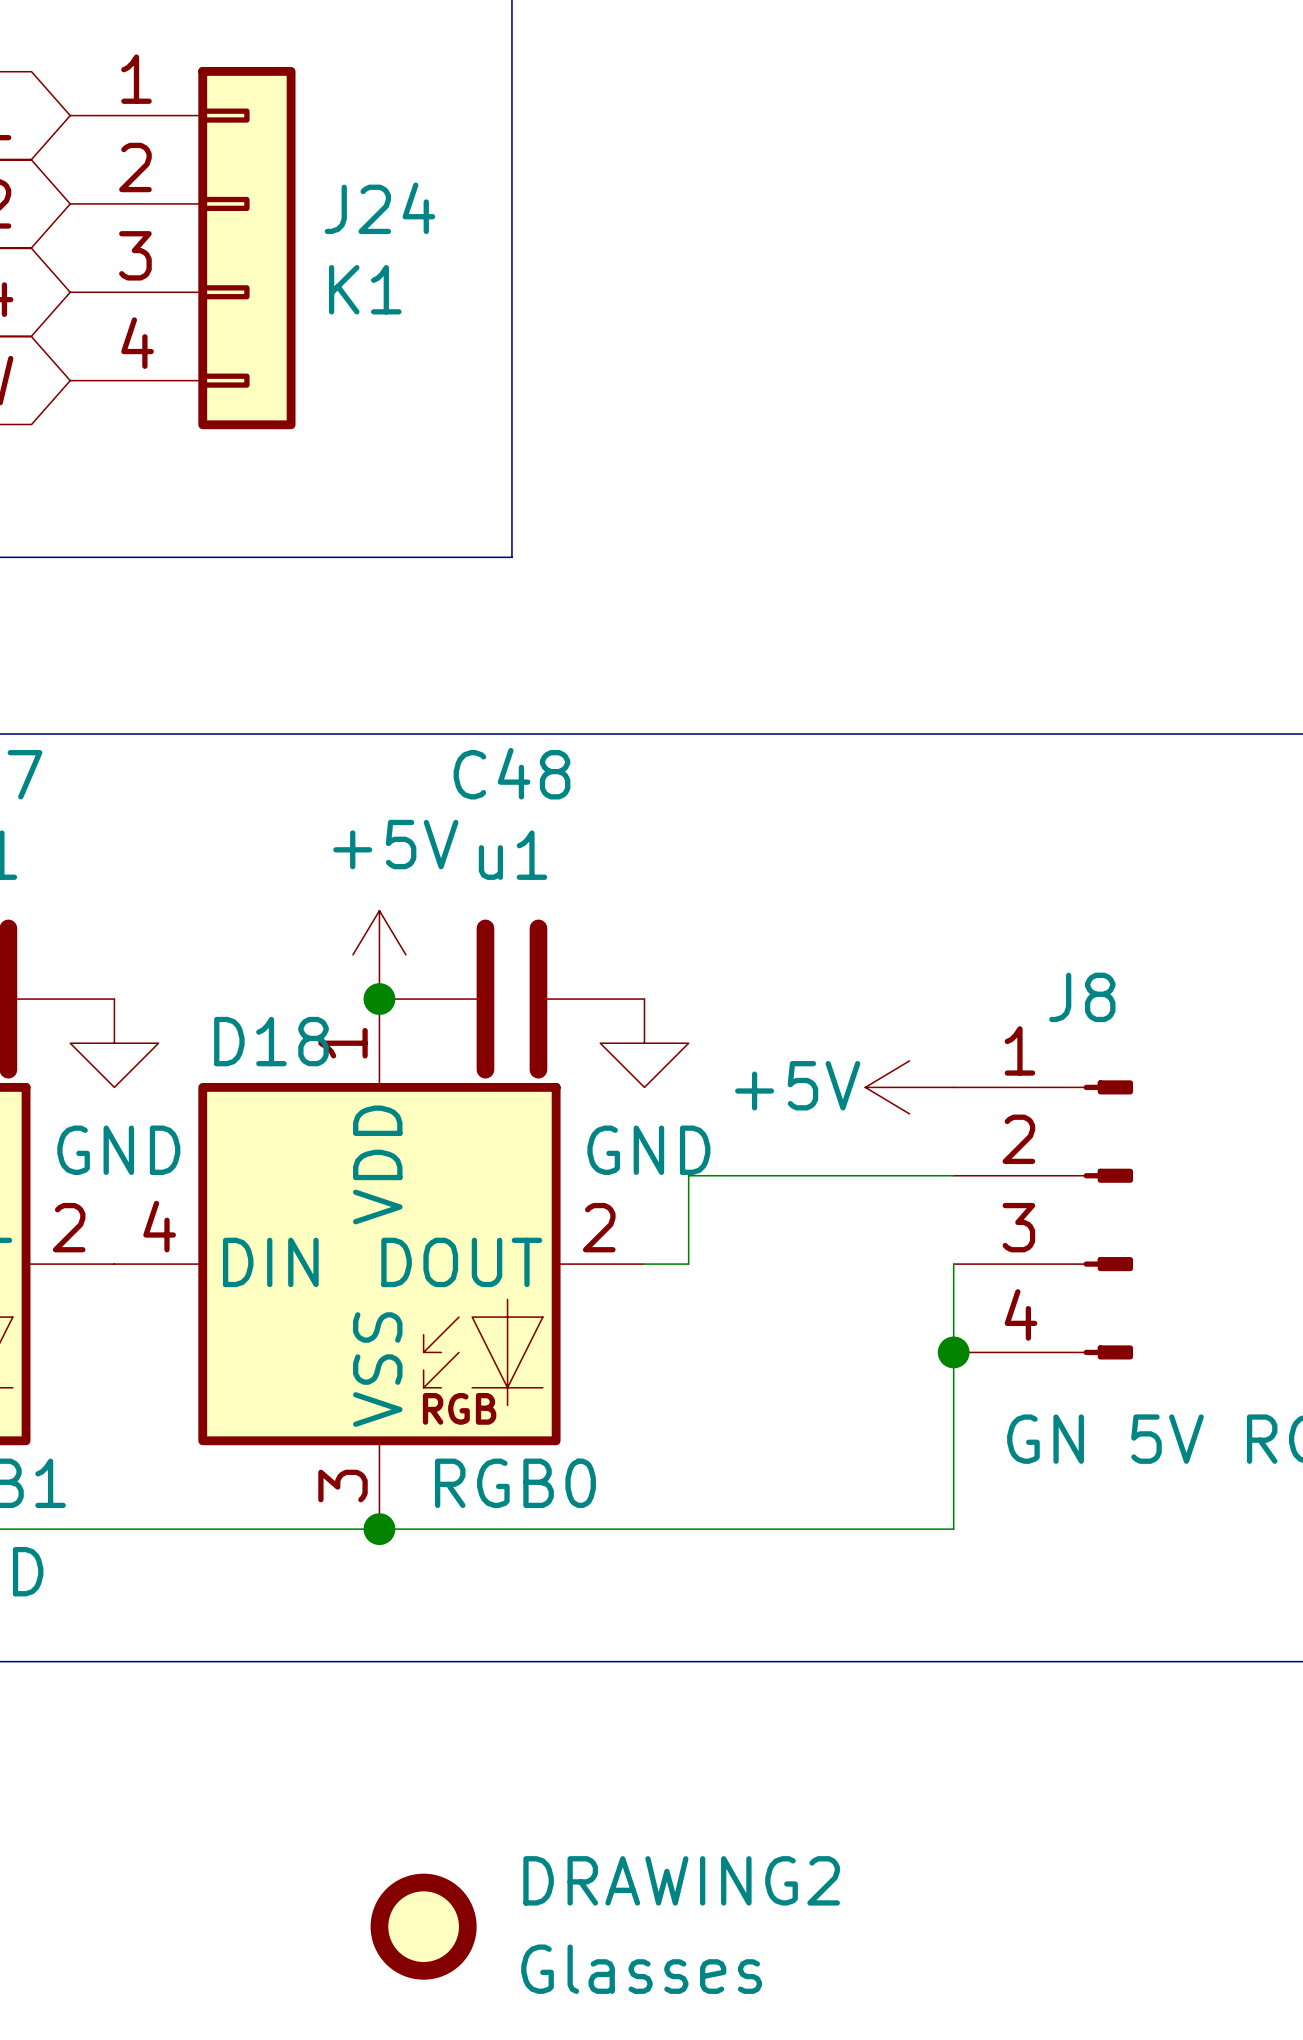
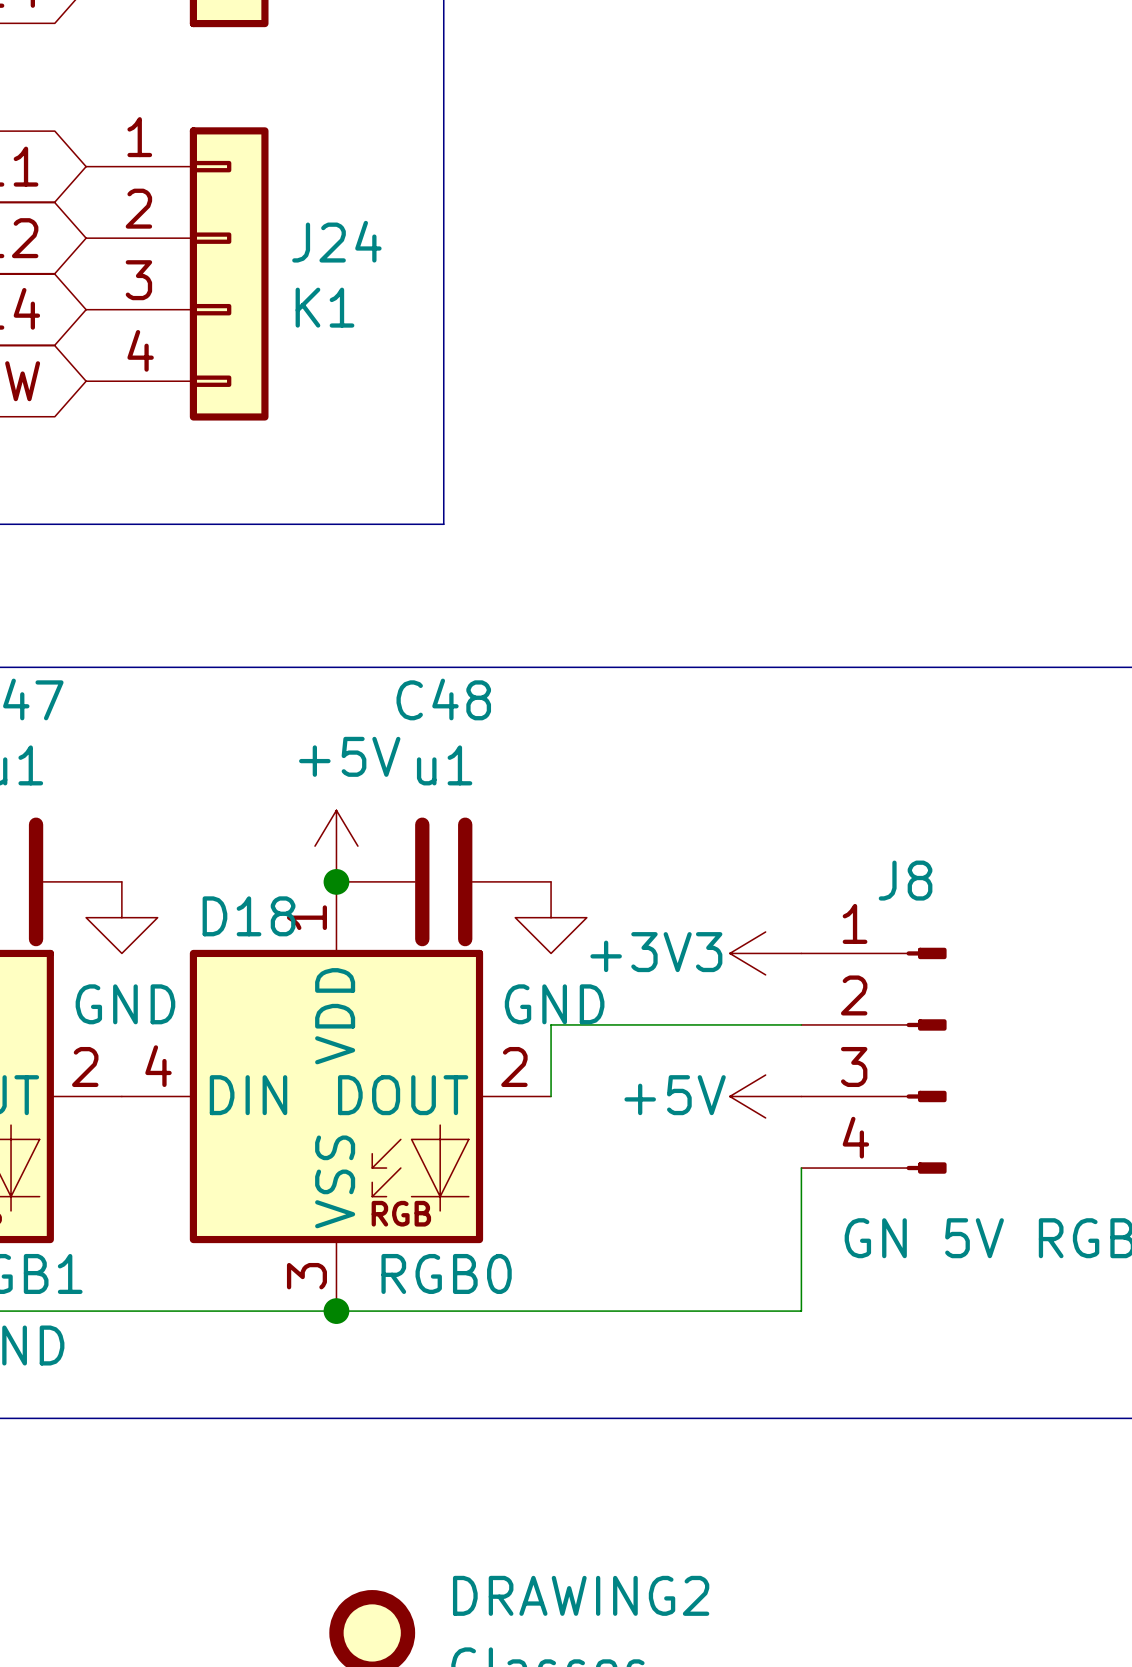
power symbol: +5V (909, 1087) -> +3V3 (765, 953)
wire: (688, 1175) (688, 1264) (644, 1264) -> (586, 1024) (551, 1024) (551, 1096)
power symbol: none -> +5V (765, 1096)
wire: (953, 1264) (953, 1352) -> none
junction: (953, 1352) -> none

